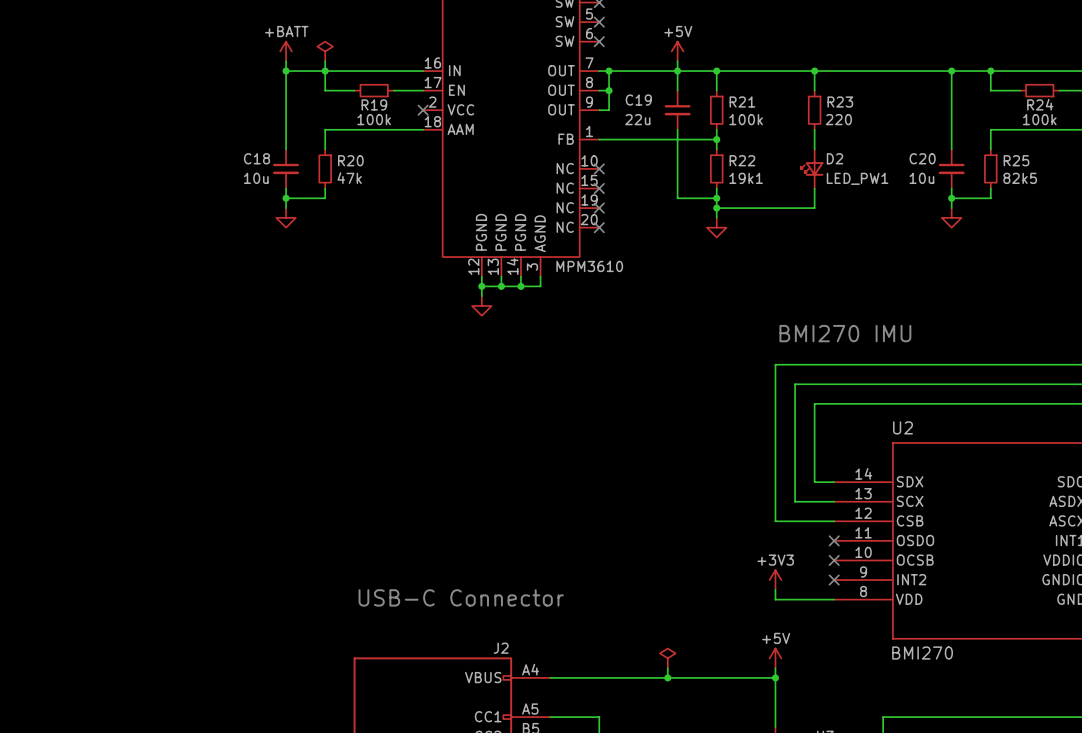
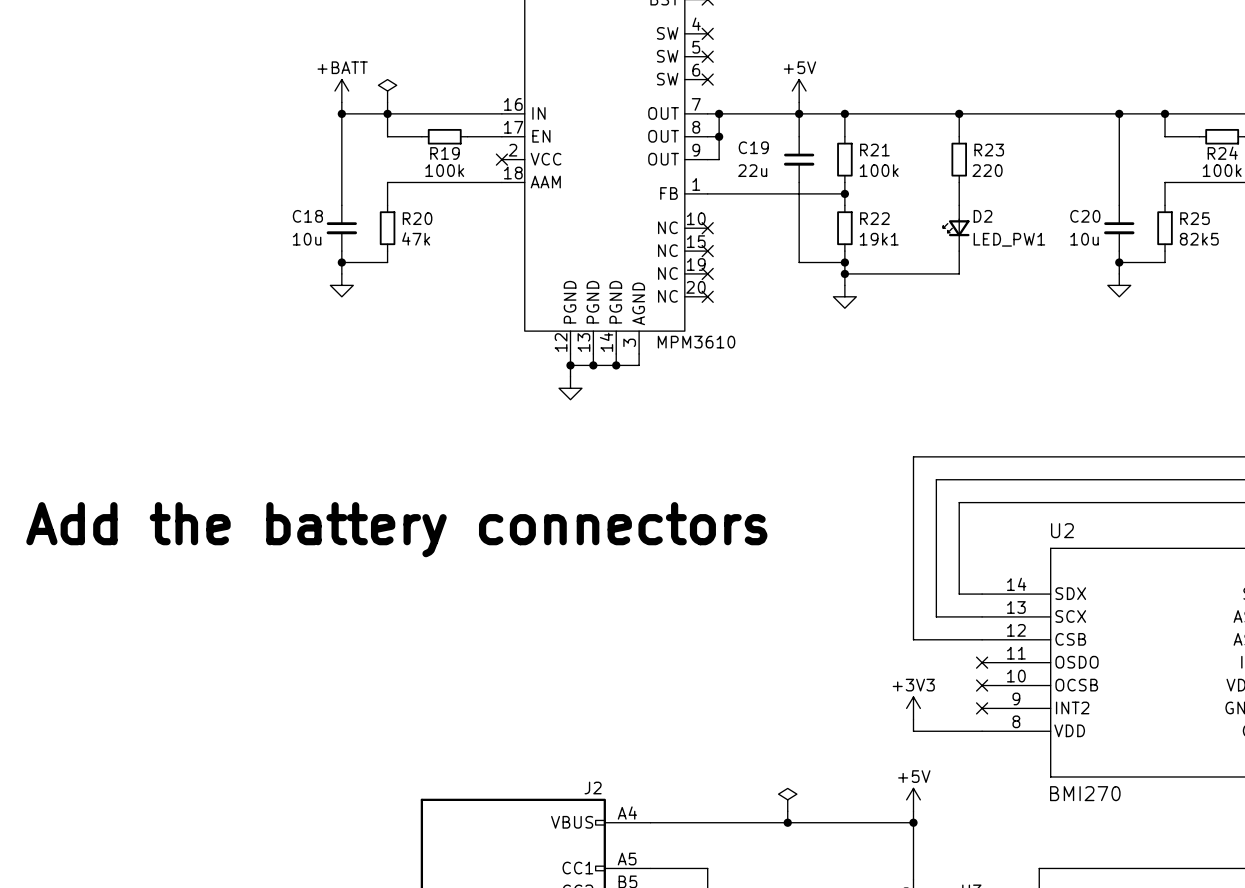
text: BMI270 IMU (845, 333) -> none
text: none -> Add the battery connectors (396, 529)
text: USB-C Connector (461, 597) -> none

